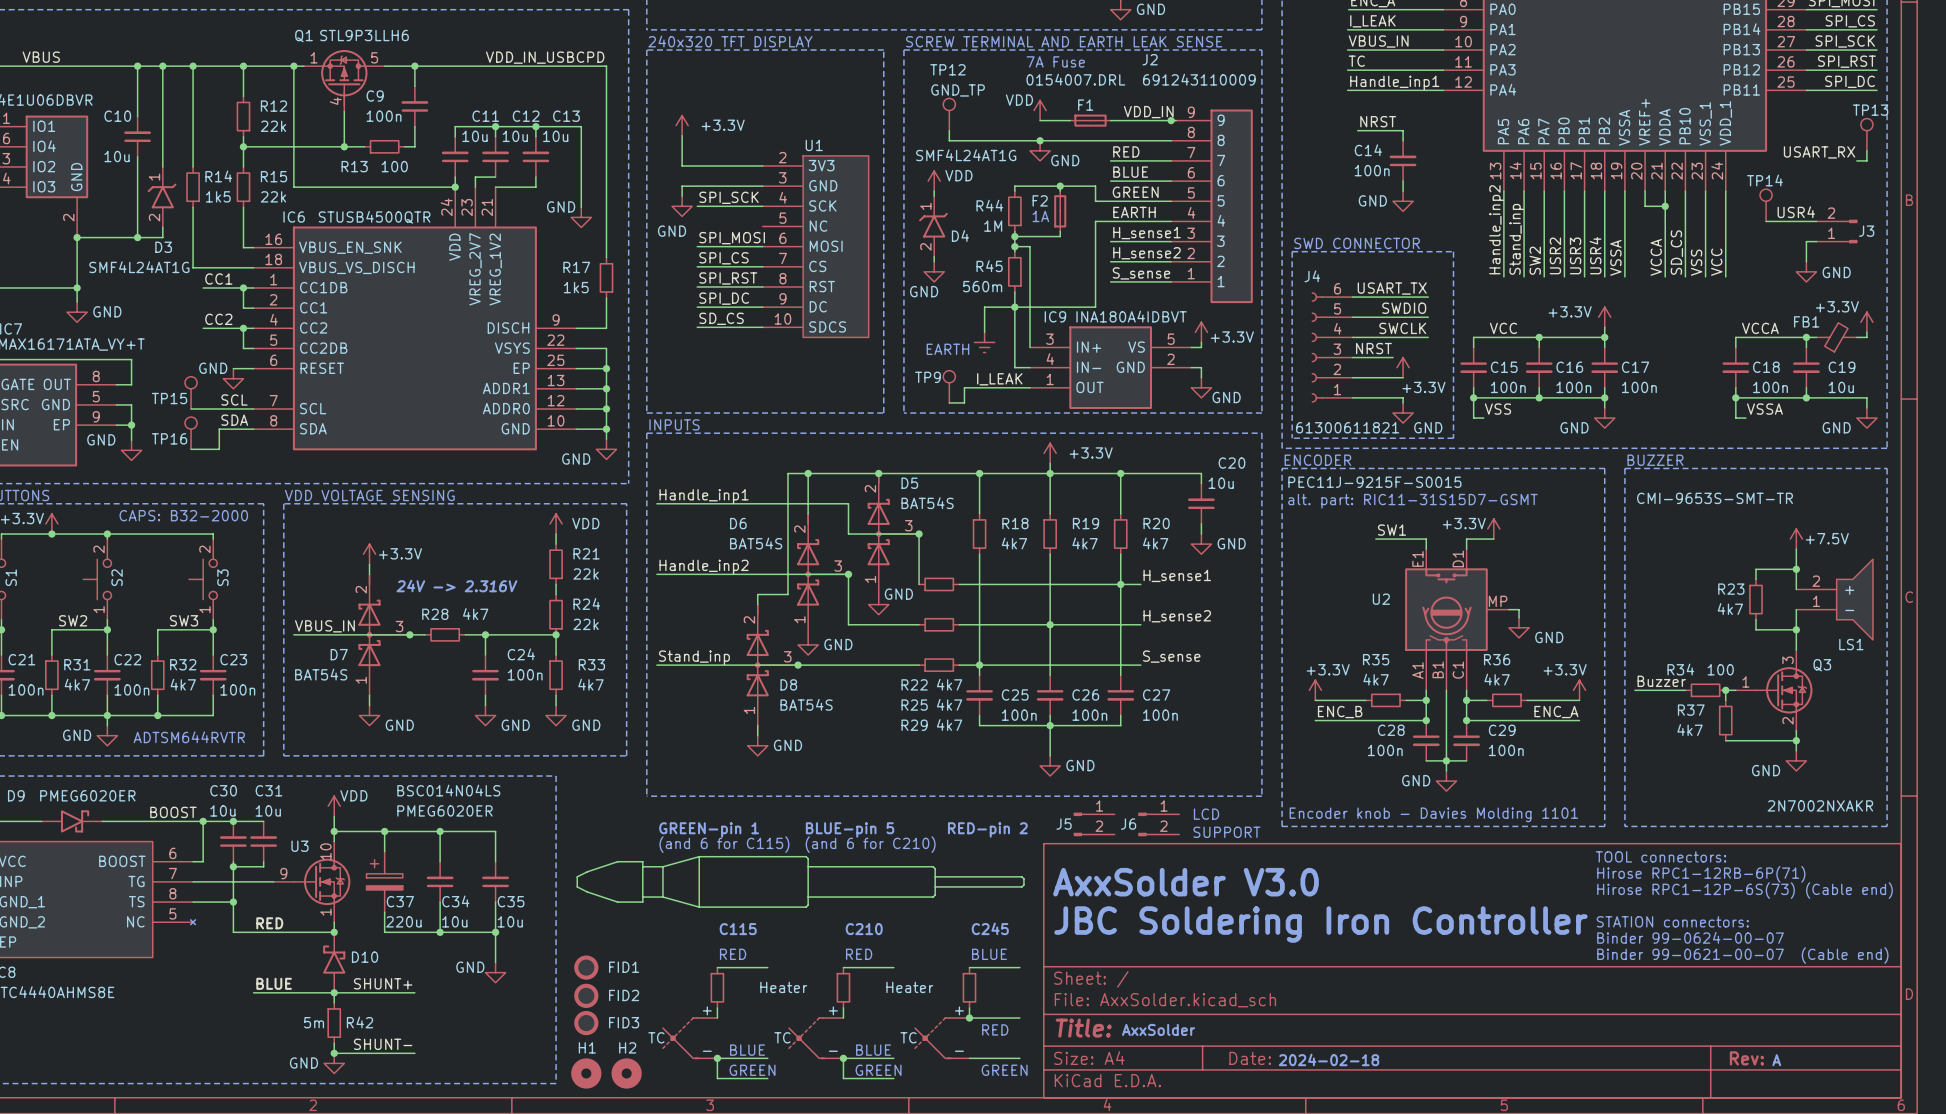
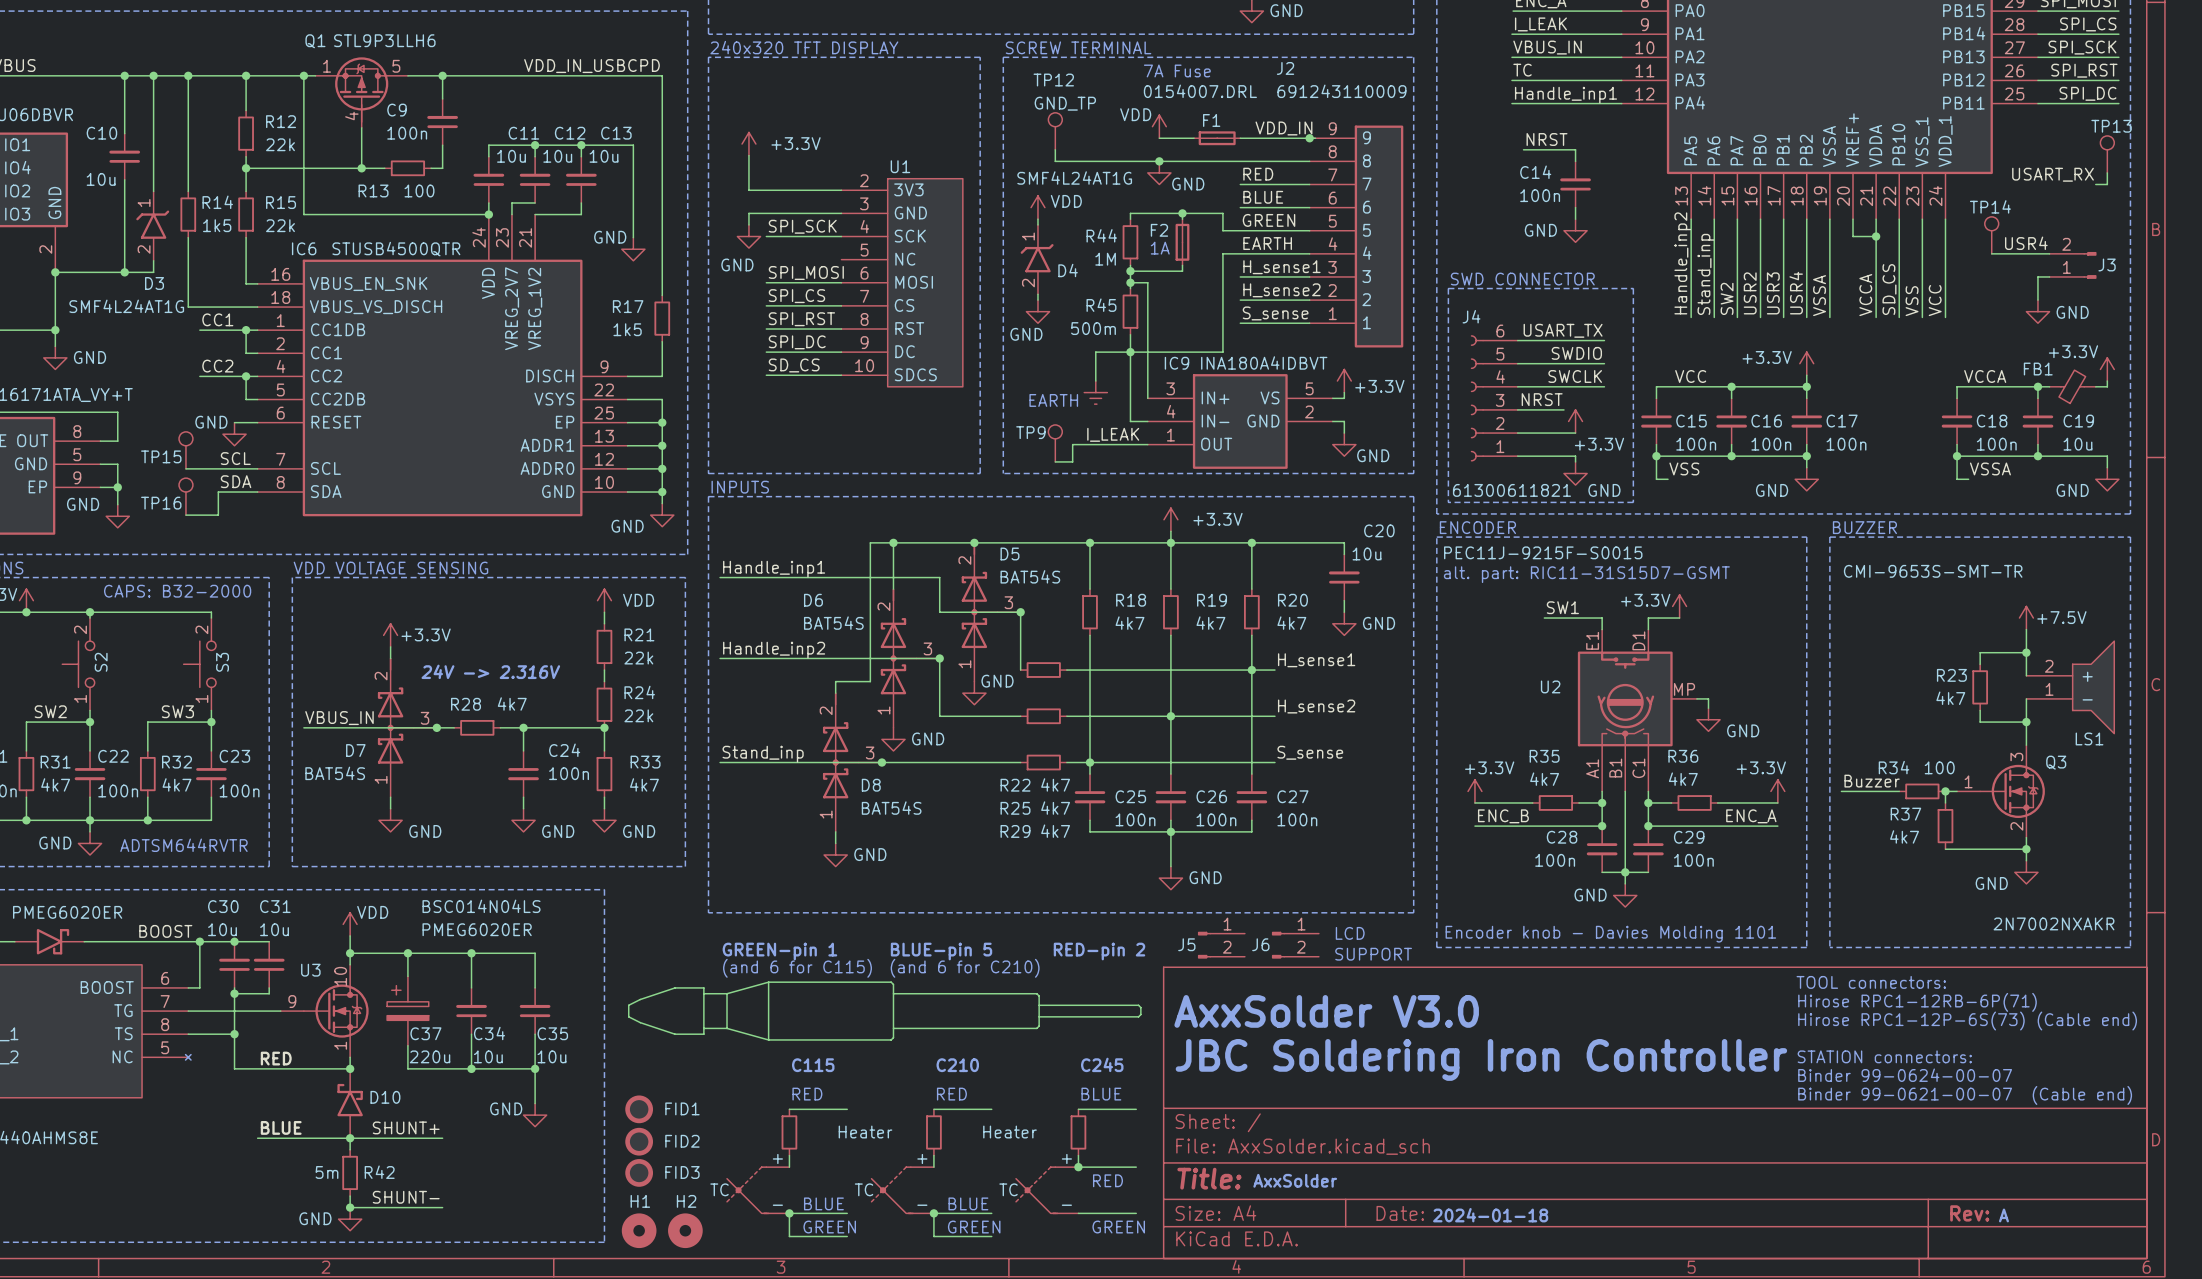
text: SCREW TERMINAL AND EARTH LEAK SENSE (1064, 41) -> SCREW TERMINAL (1078, 47)
R45 value: 560m (982, 286) -> 500m (1093, 328)
text: 2024-02-18 (1329, 1059) -> 2024-01-18 (1490, 1215)

